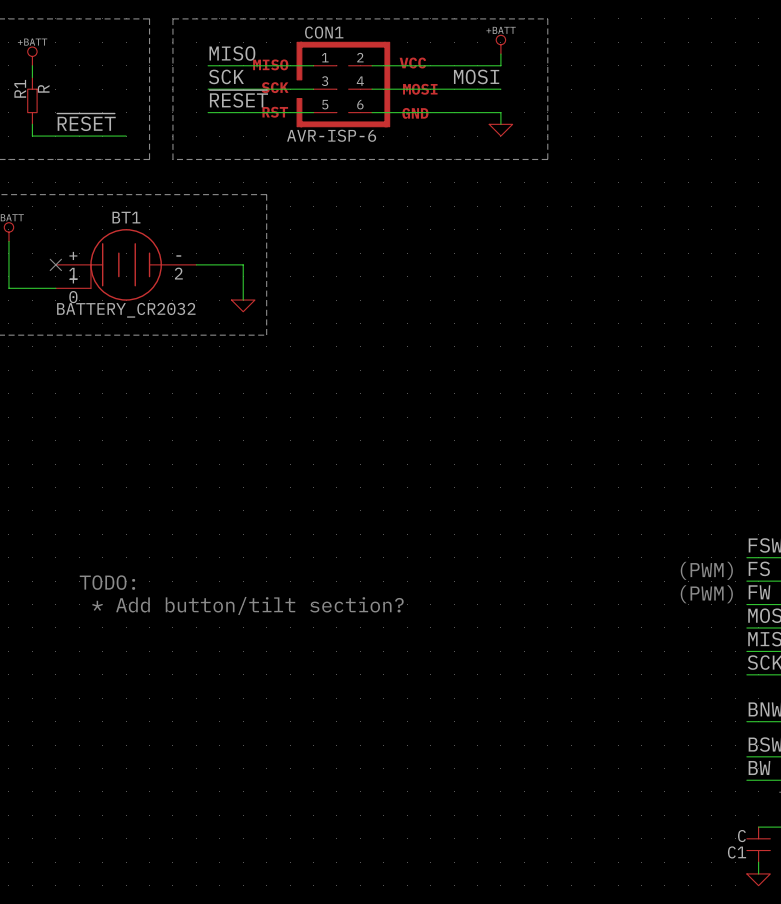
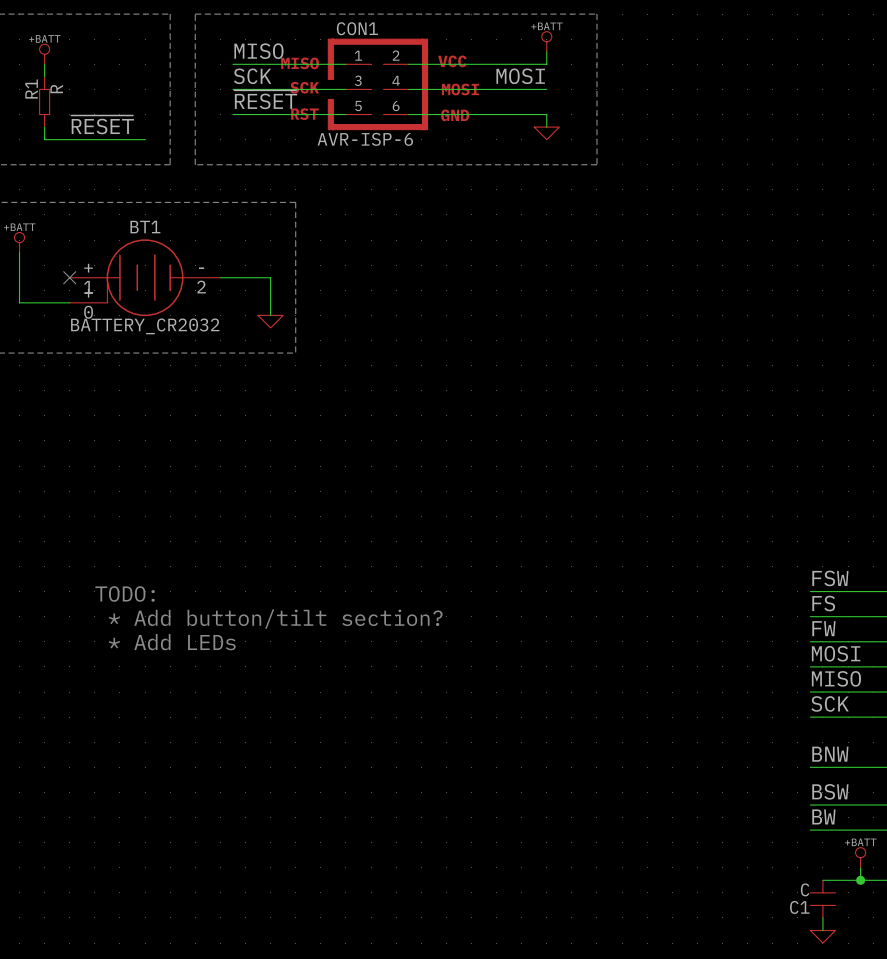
text: none -> TODO: (125, 593)
text: (PWM) (706, 570) -> none
text: TODO: (107, 582) -> * Add button/tilt section? (275, 619)
text: (PWM) (706, 594) -> none
text: * Add button/tilt section? (247, 605) -> * Add LEDs (172, 642)

